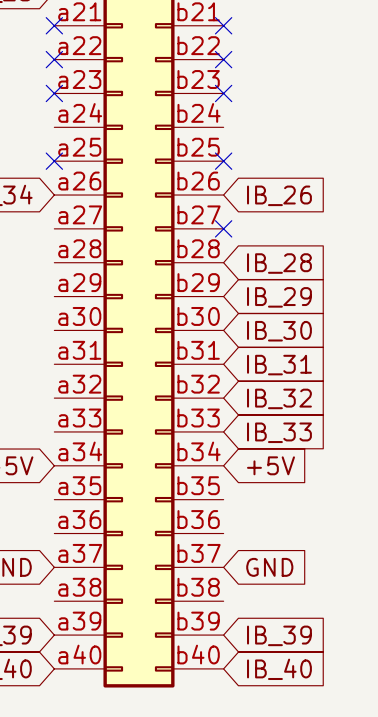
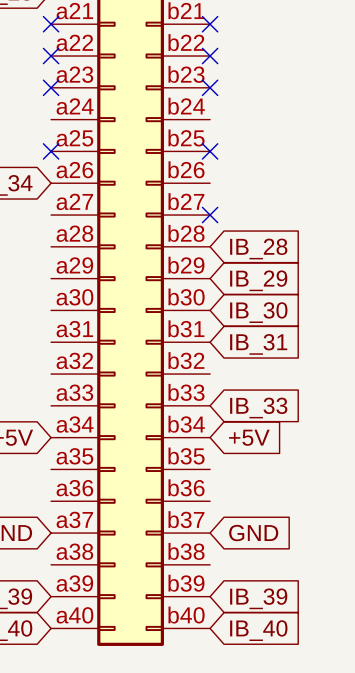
global label: IB_26 (279, 195) -> none
global label: IB_32 (279, 398) -> none

